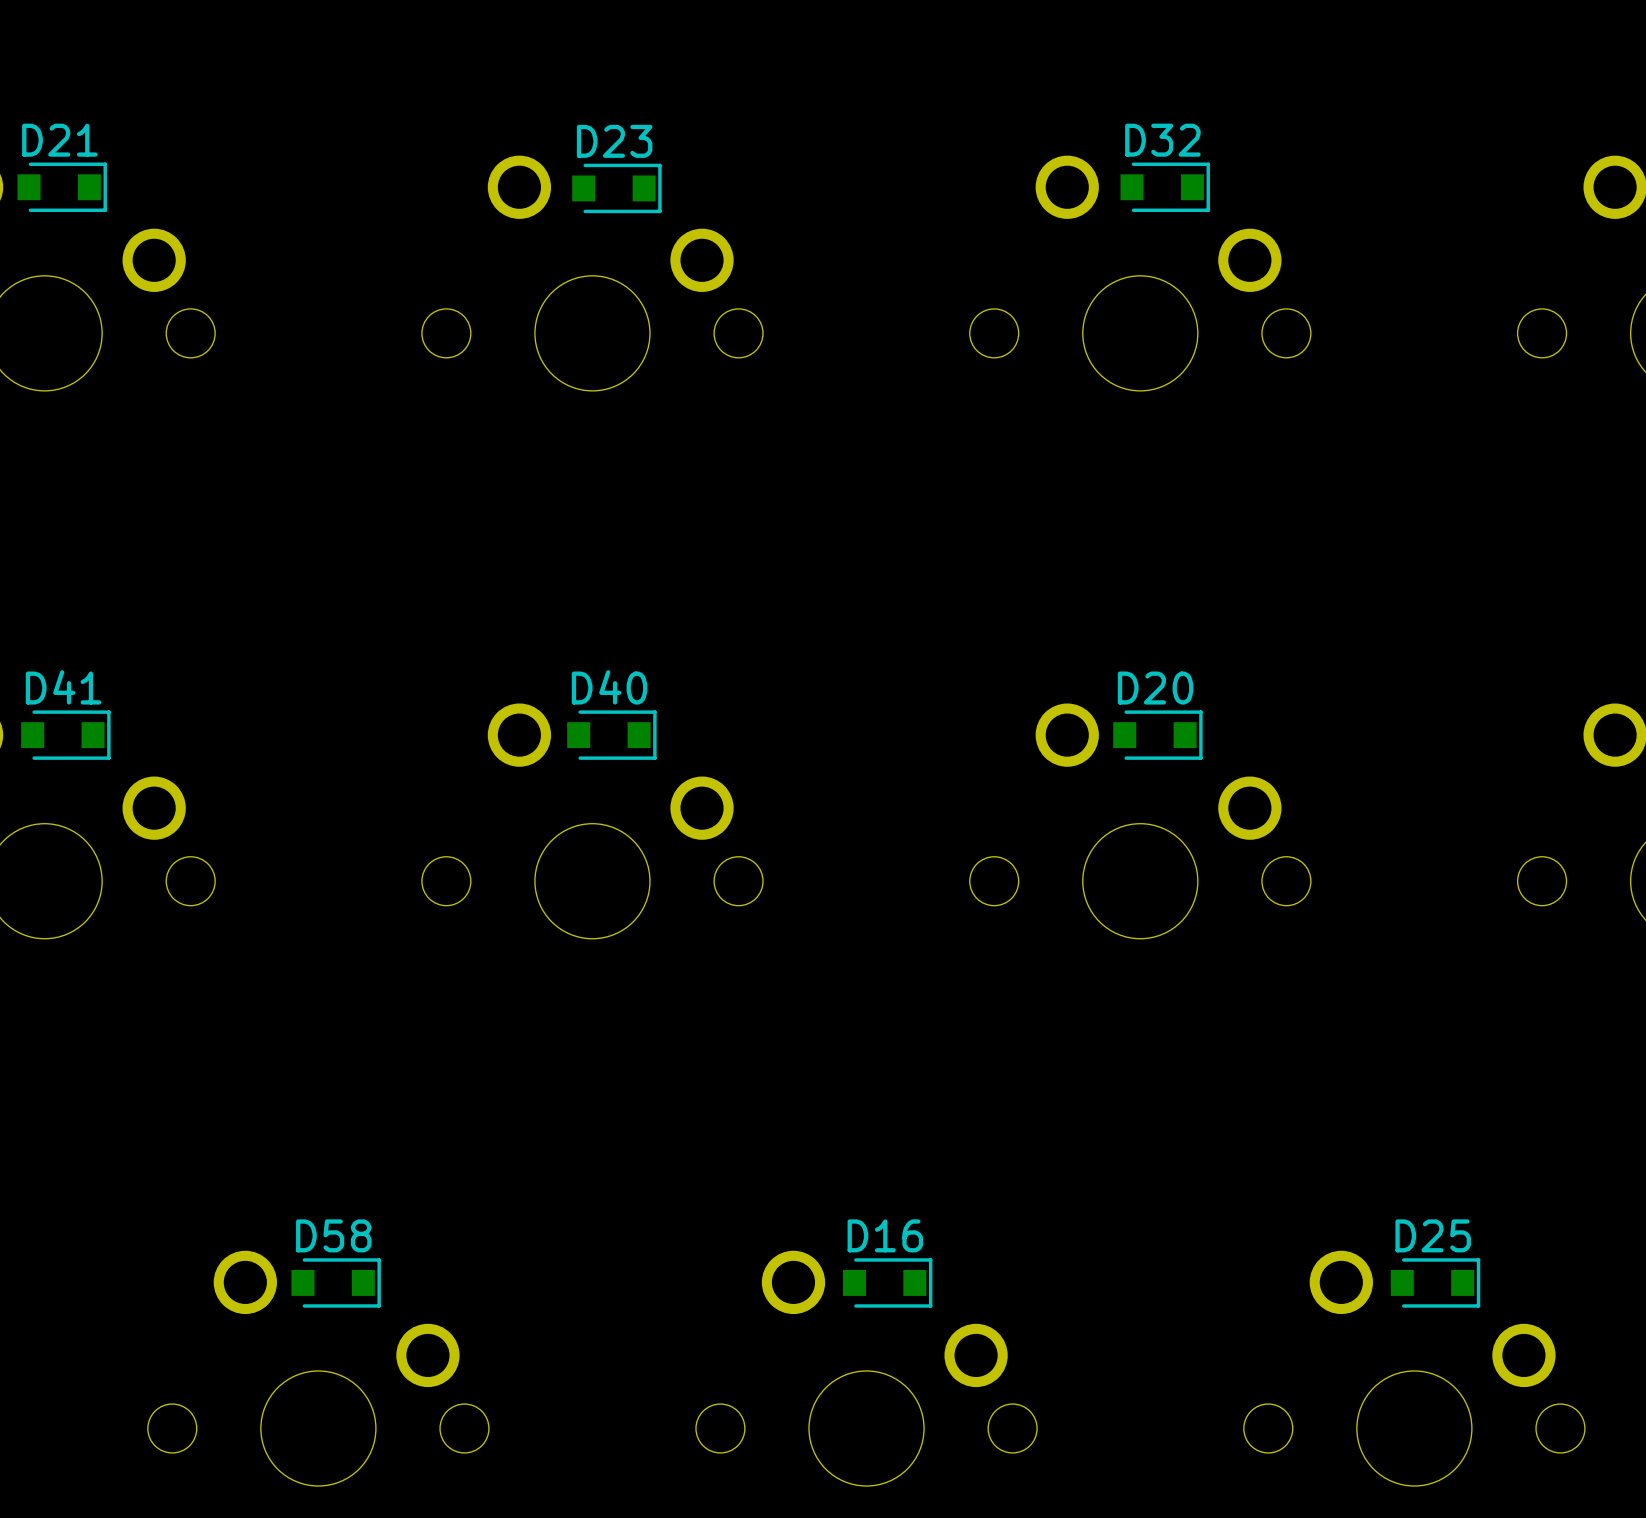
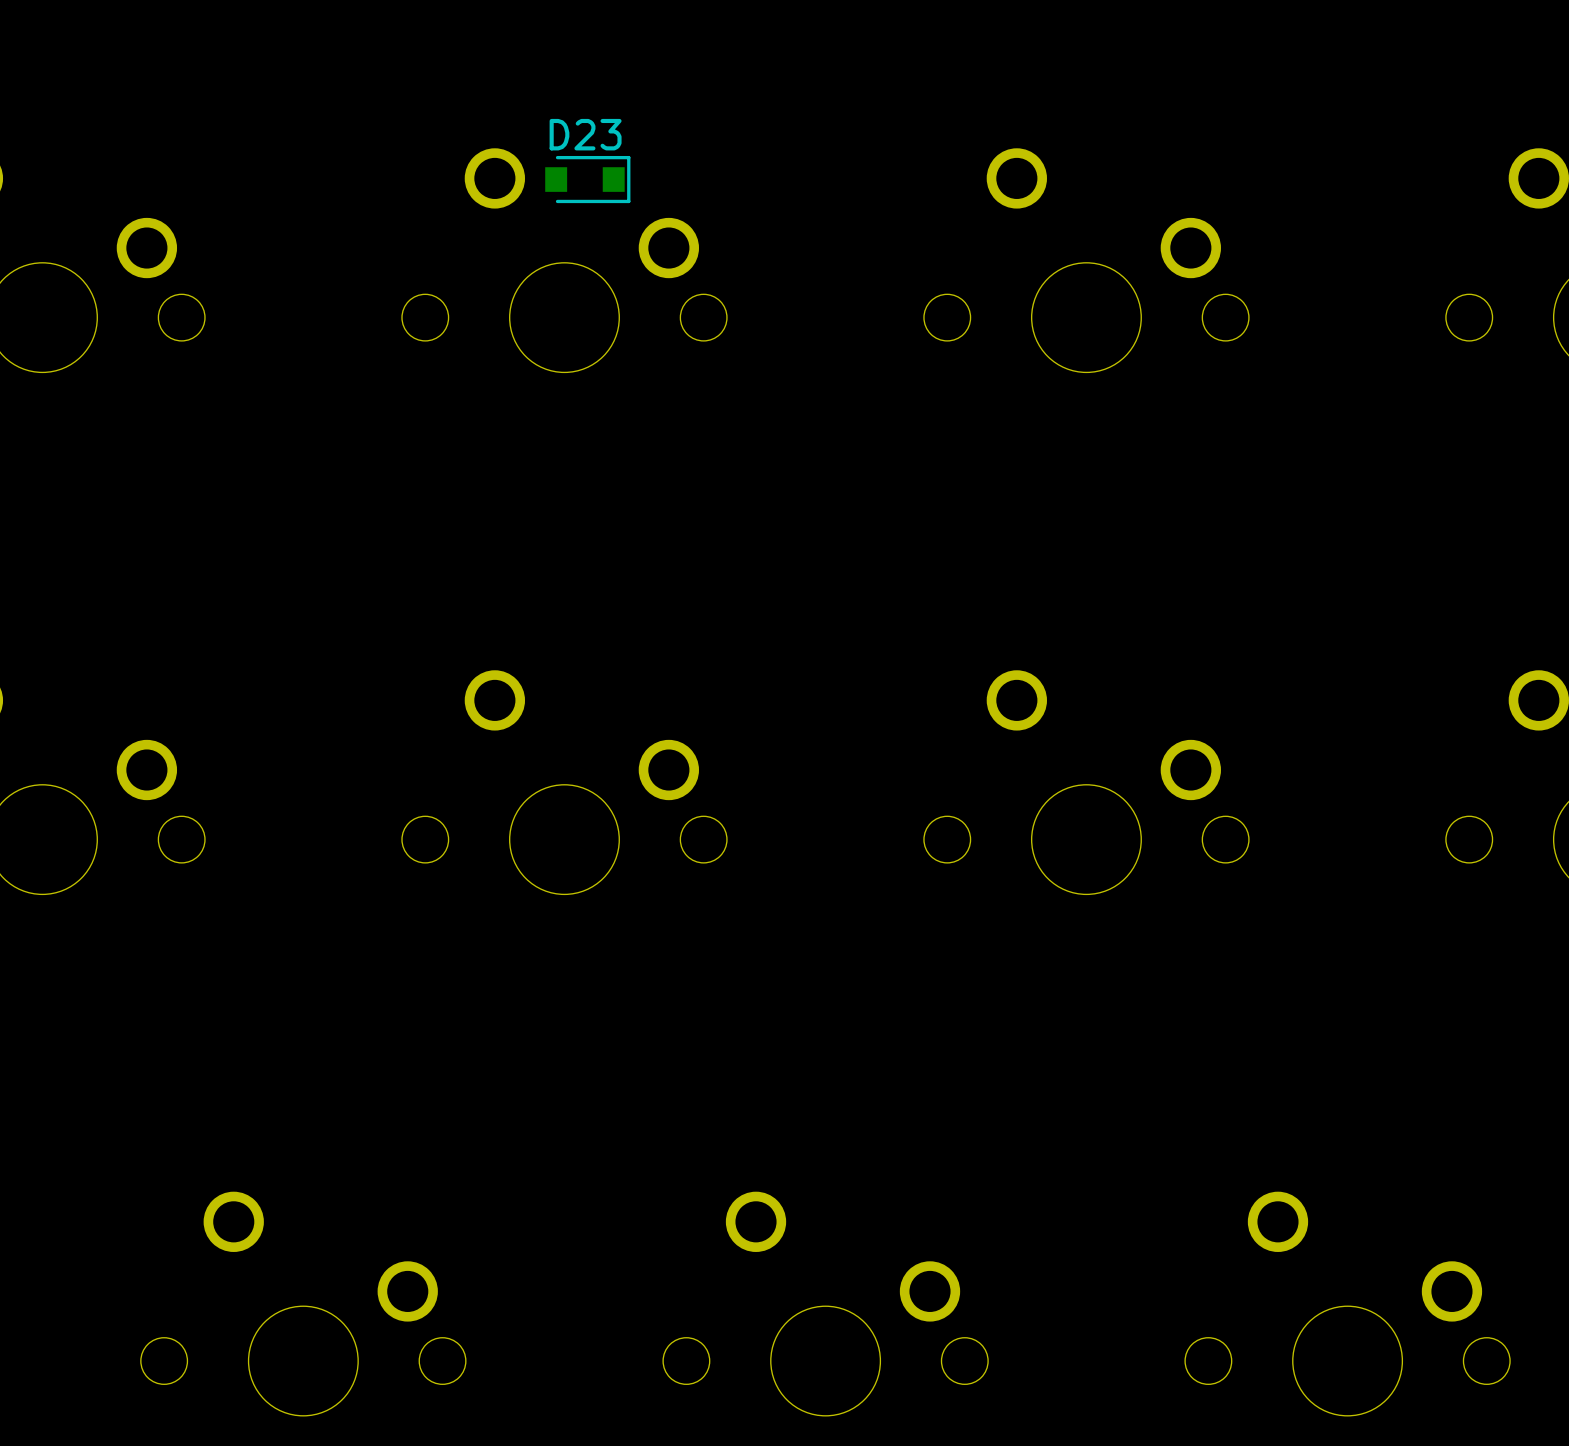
D21: (62, 187) -> none
D32: (1165, 187) -> none
D41: (65, 735) -> none
D40: (611, 735) -> none
D20: (1157, 735) -> none
D58: (336, 1282) -> none
D16: (887, 1282) -> none
D25: (1435, 1282) -> none

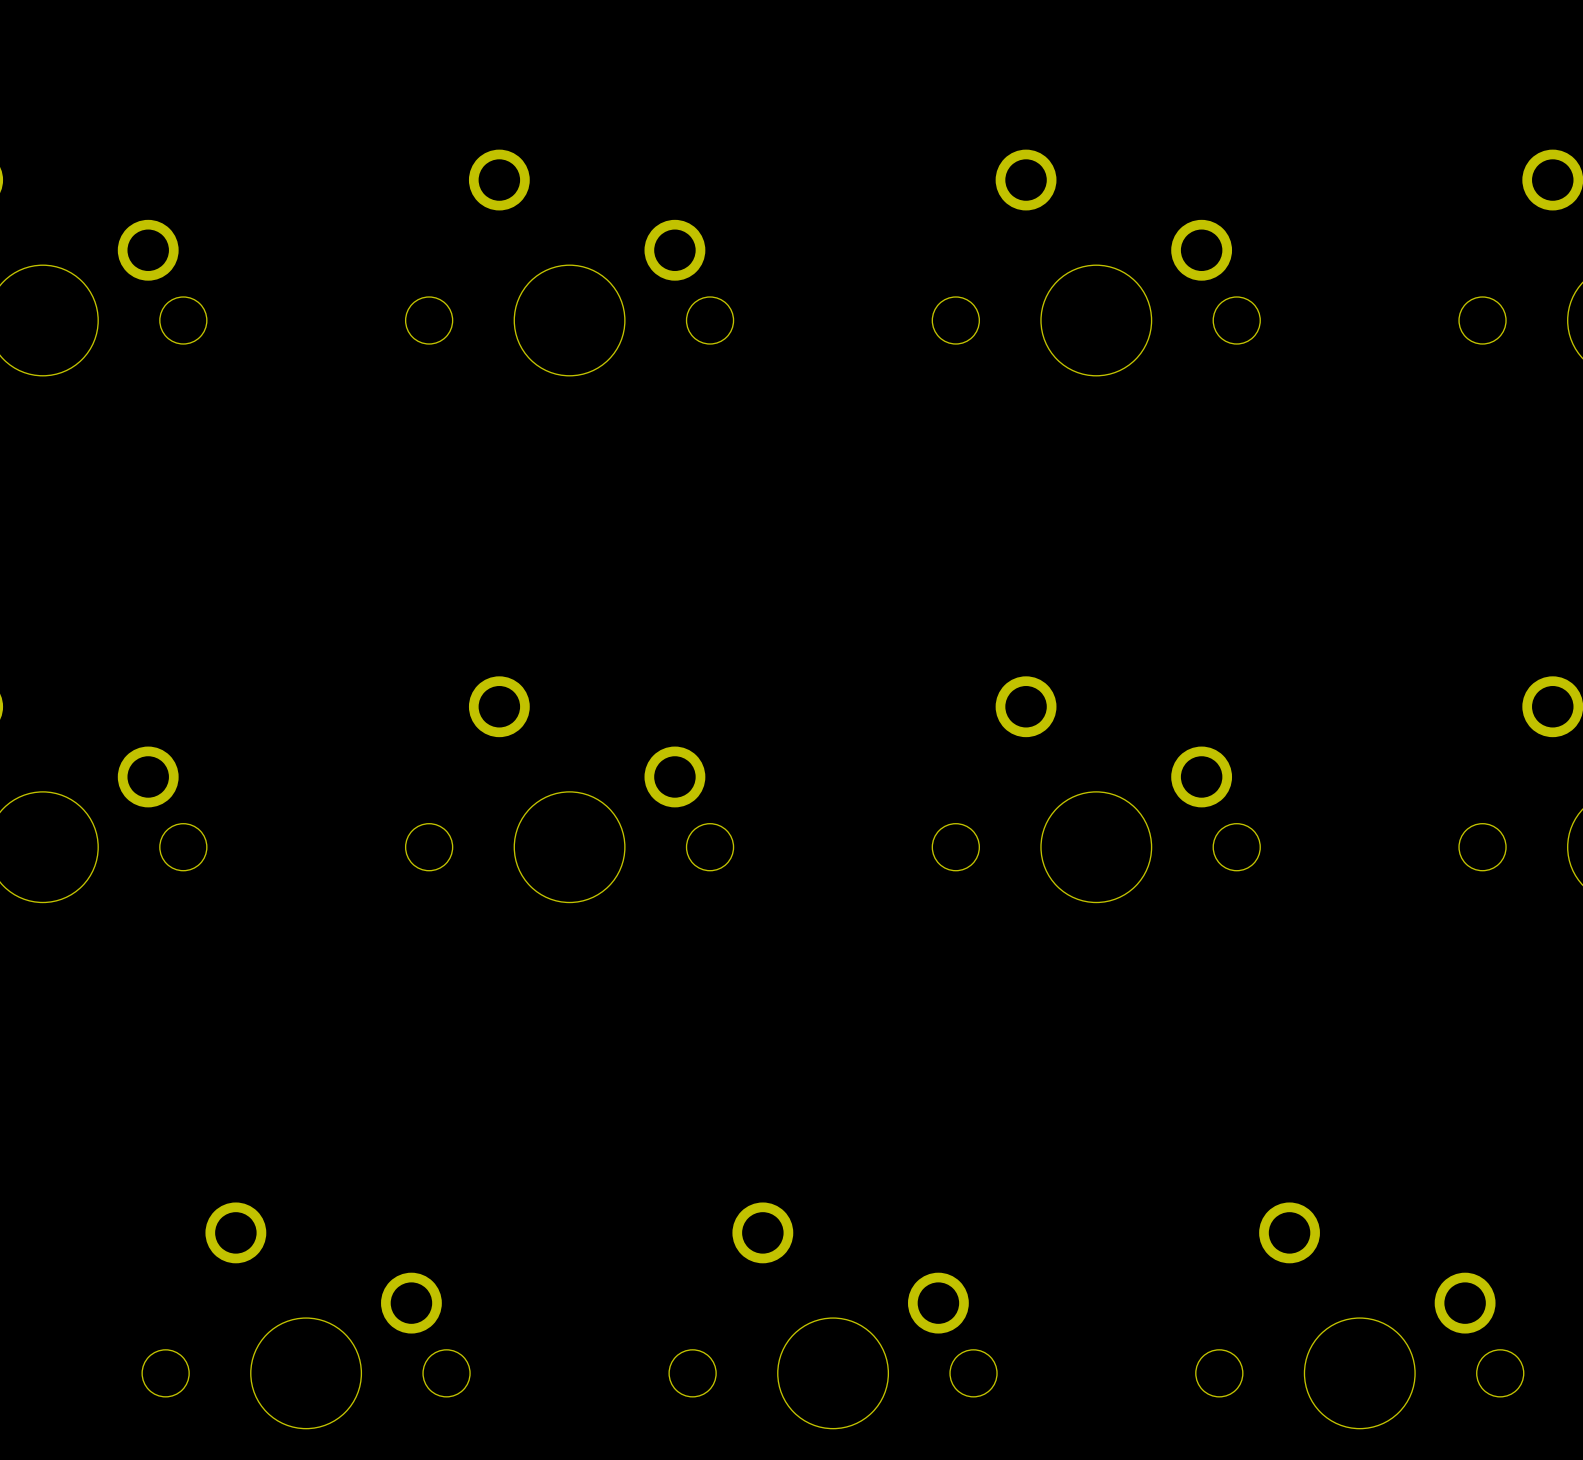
D23: (587, 179) -> none

